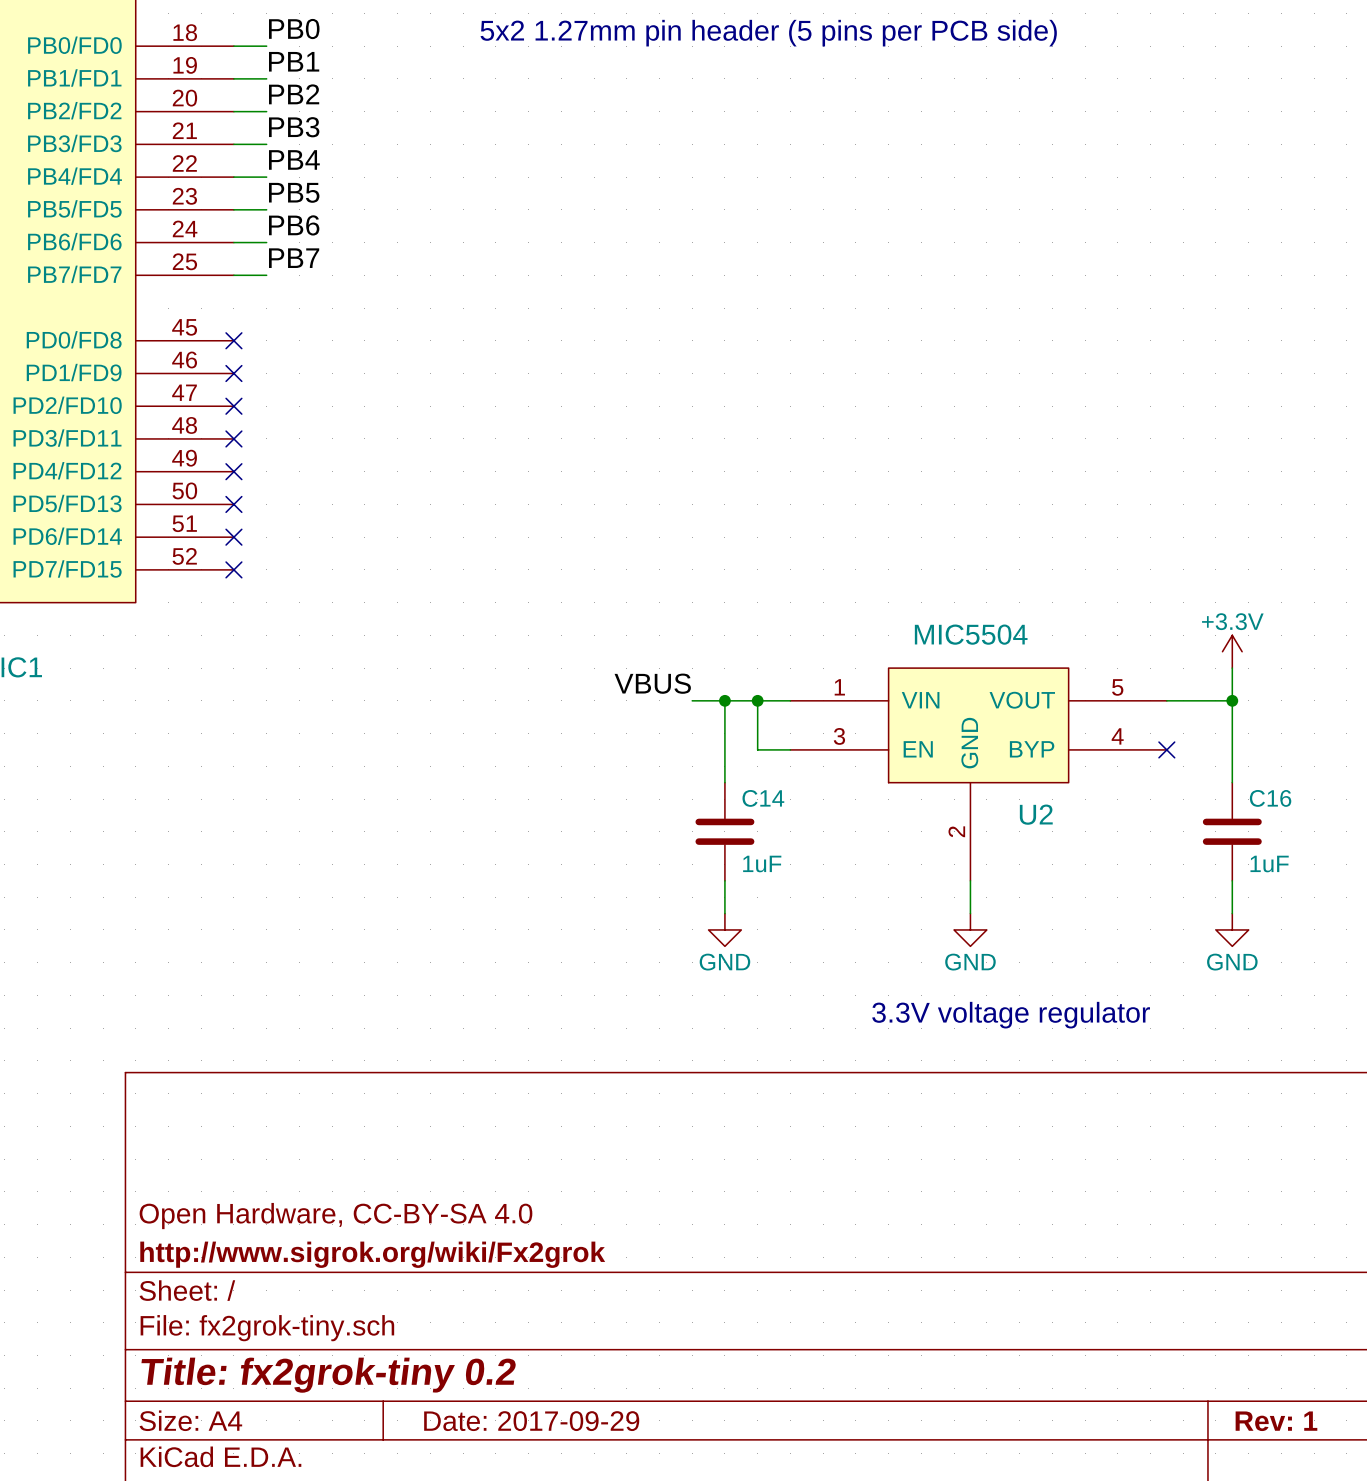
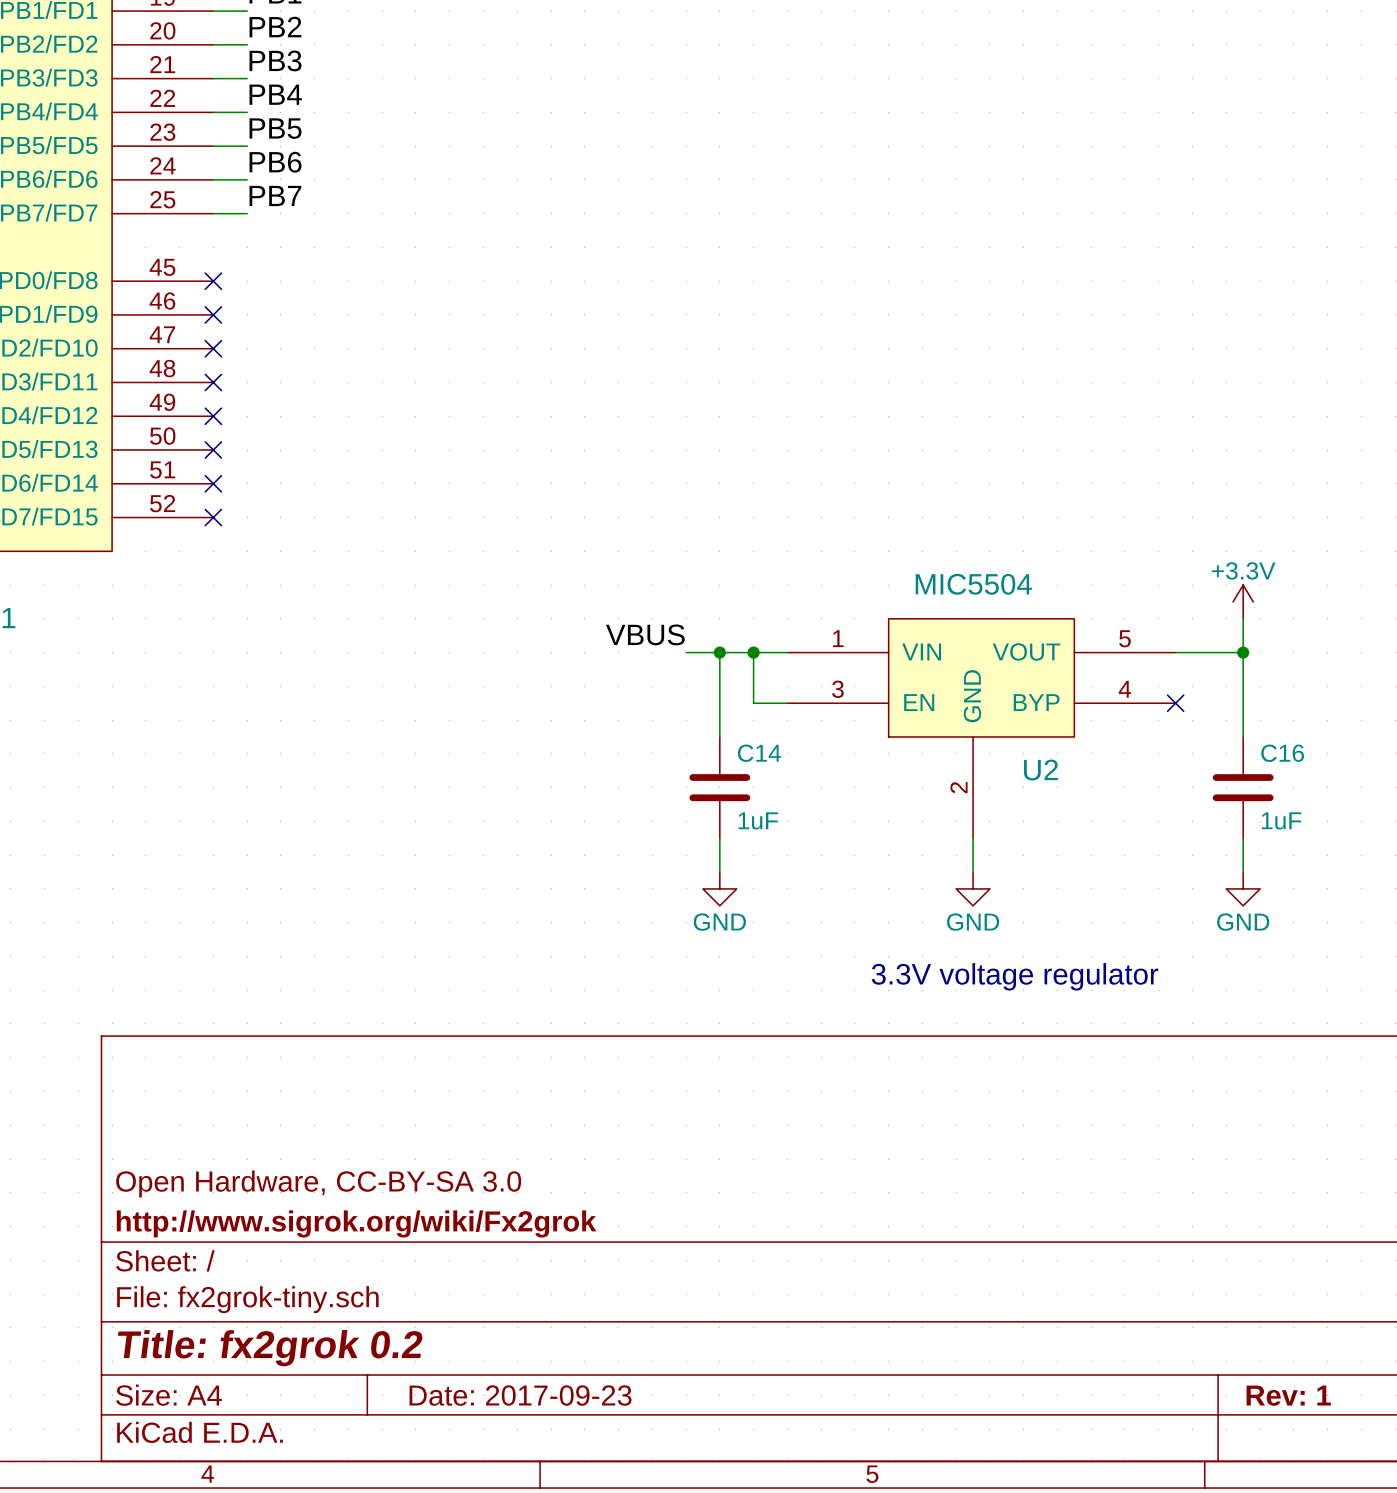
title block: Open Hardware, CC-BY-SA 4.0 (336, 1216) -> Open Hardware, CC-BY-SA 3.0 (318, 1184)
title block: Title: fx2grok-tiny 0.2 (328, 1375) -> Title: fx2grok 0.2 (270, 1348)
title block: Date: 2017-09-29 (531, 1421) -> Date: 2017-09-23 (520, 1395)

